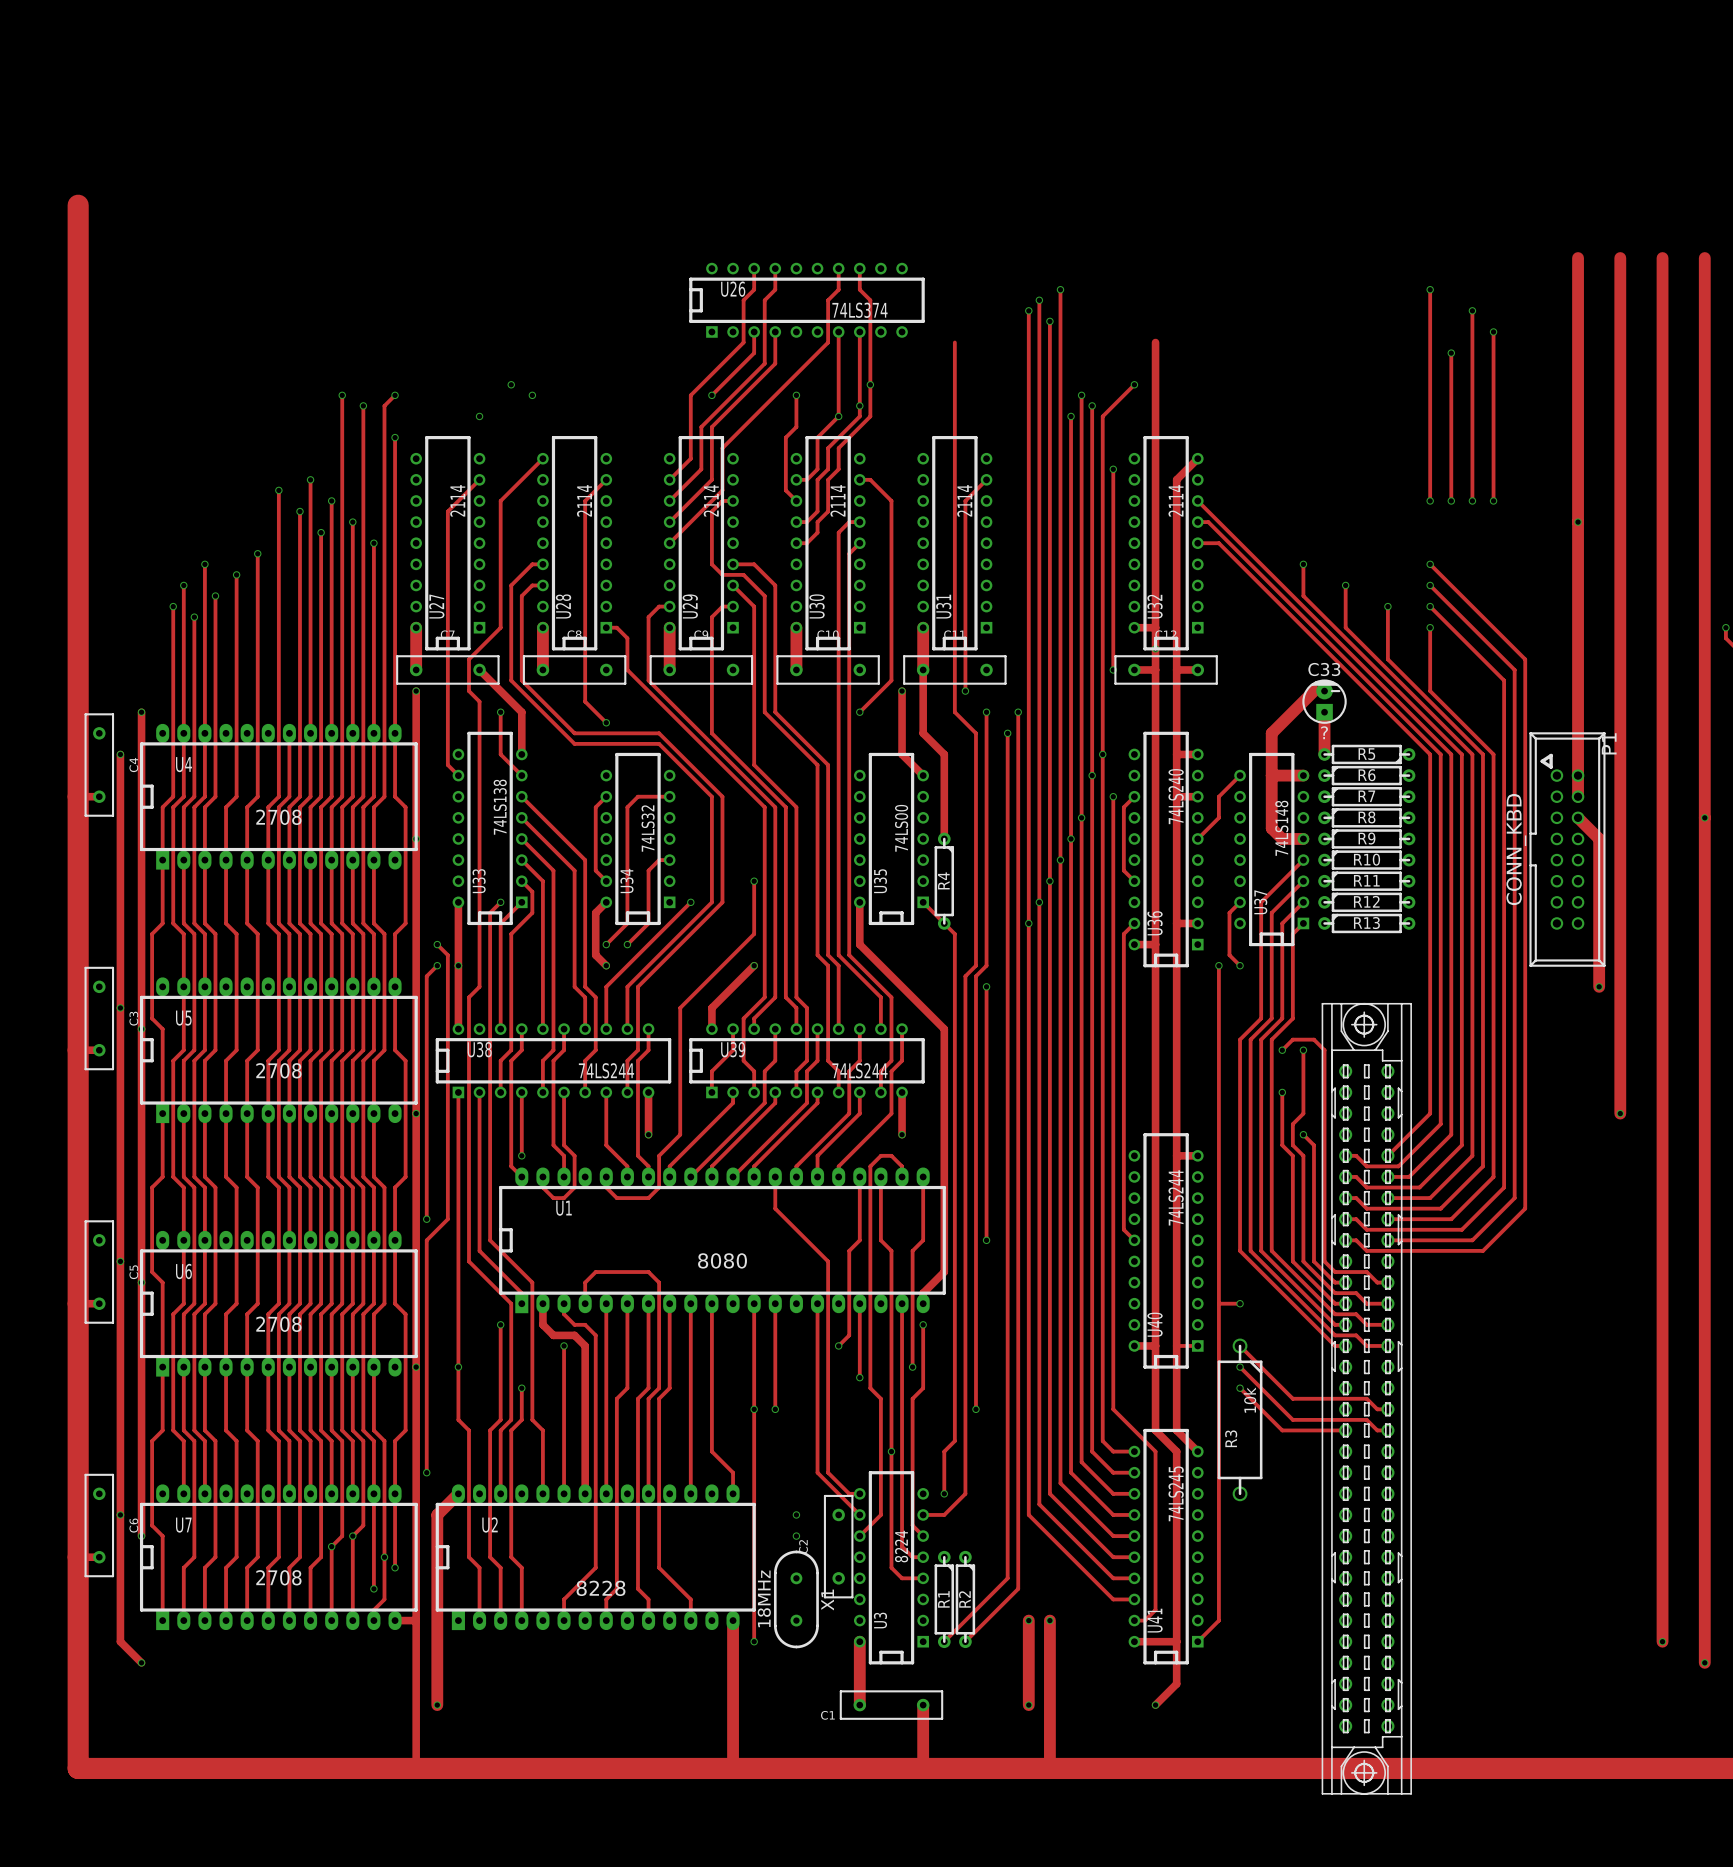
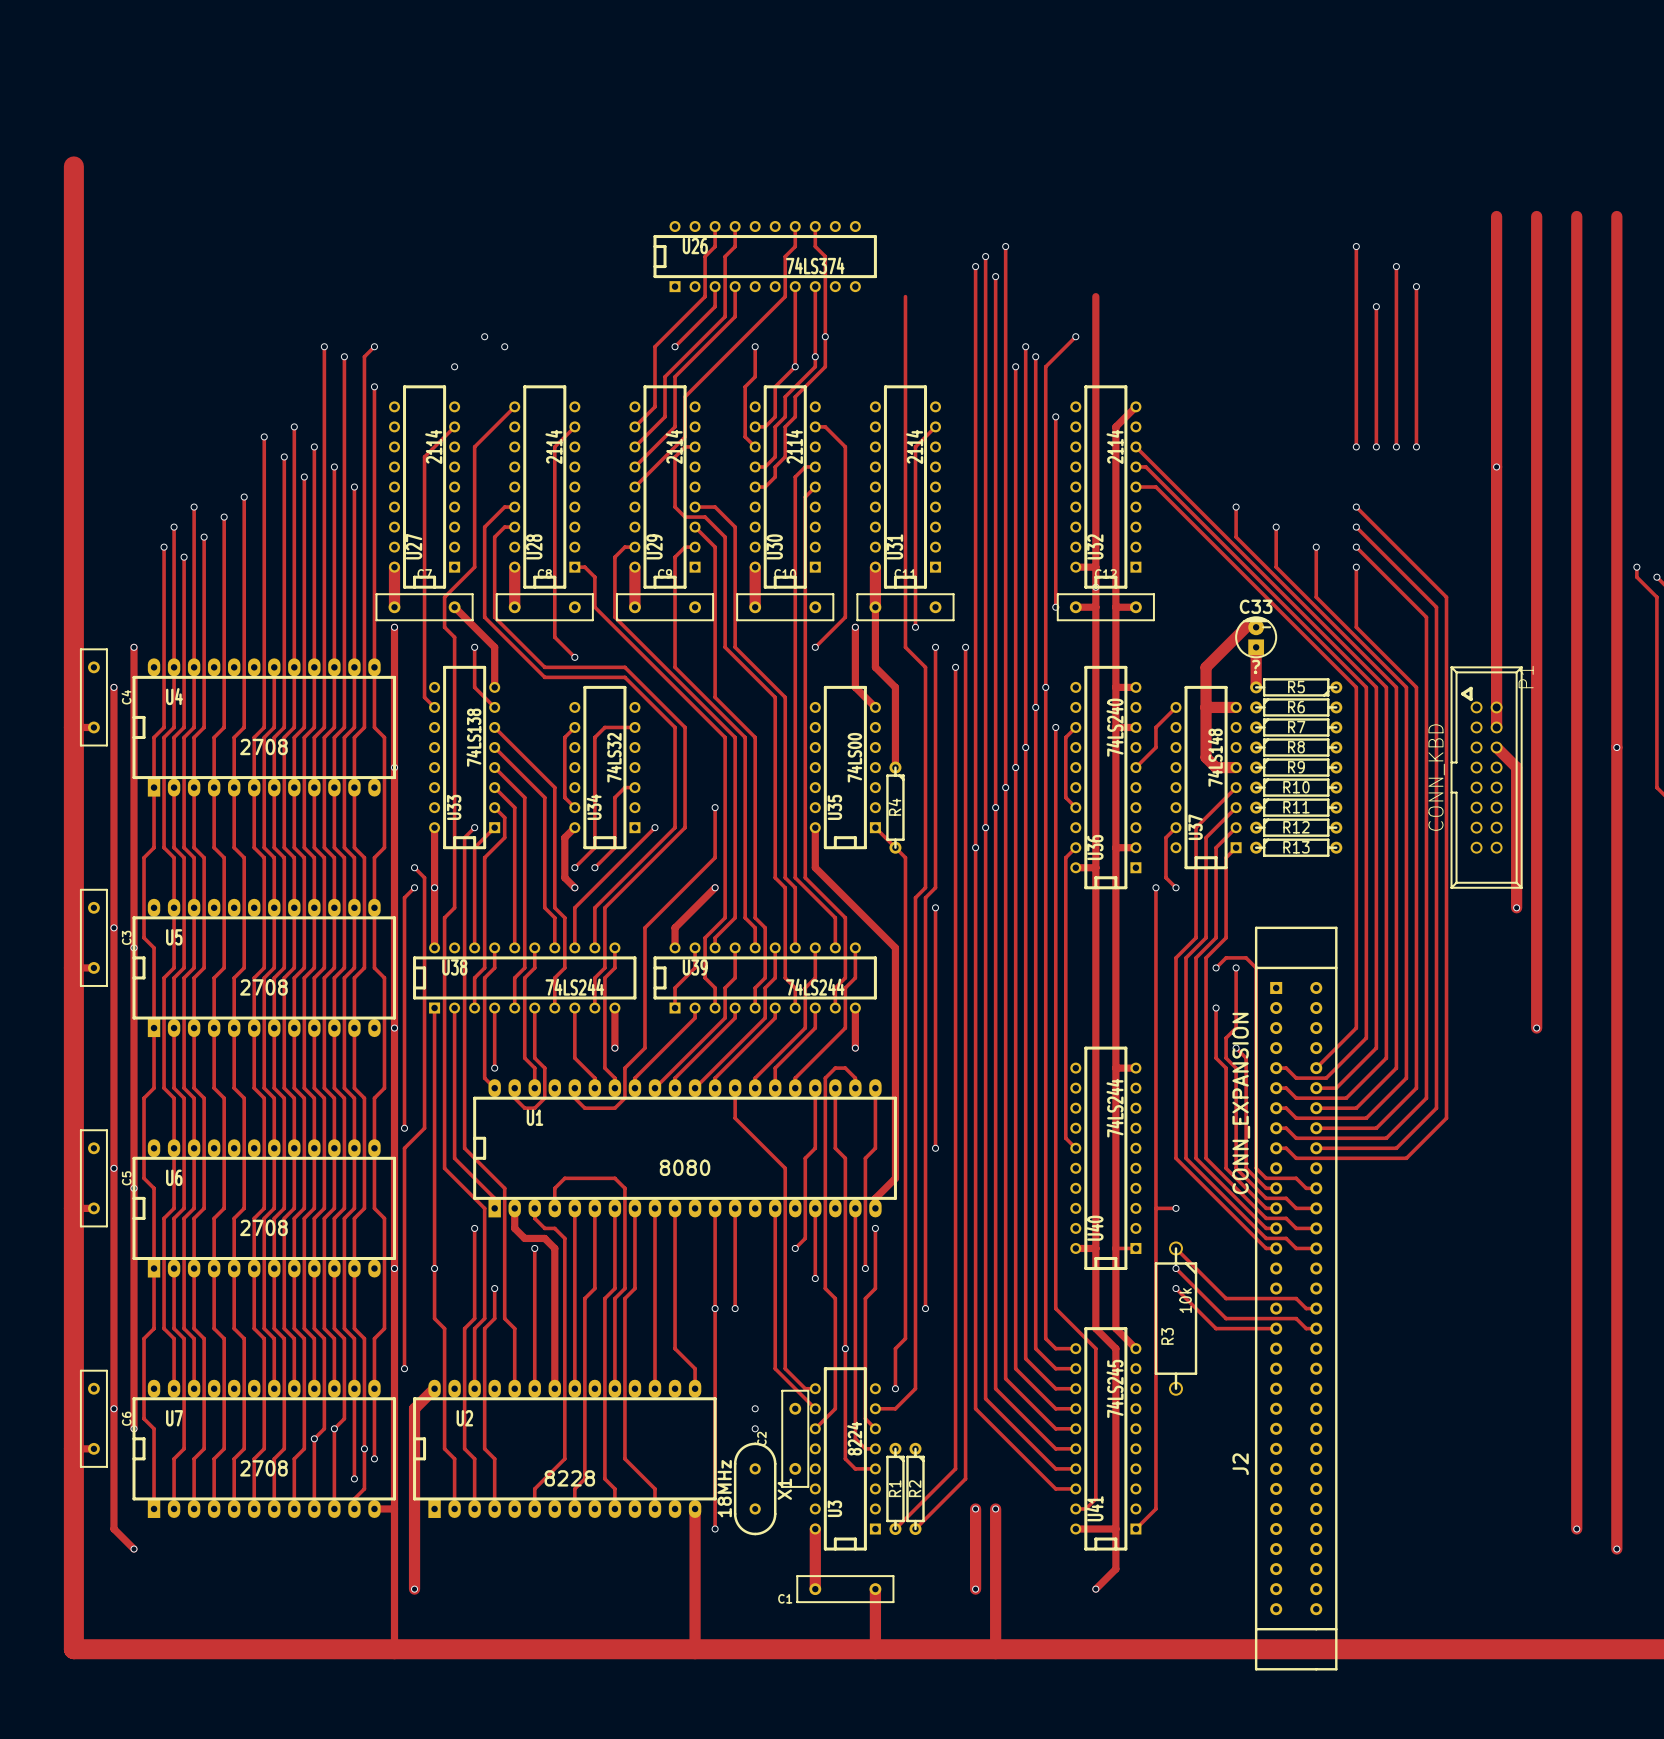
part: (1366, 1398) -> none
J2: none -> CONN_EXPANSION (1296, 1298)

